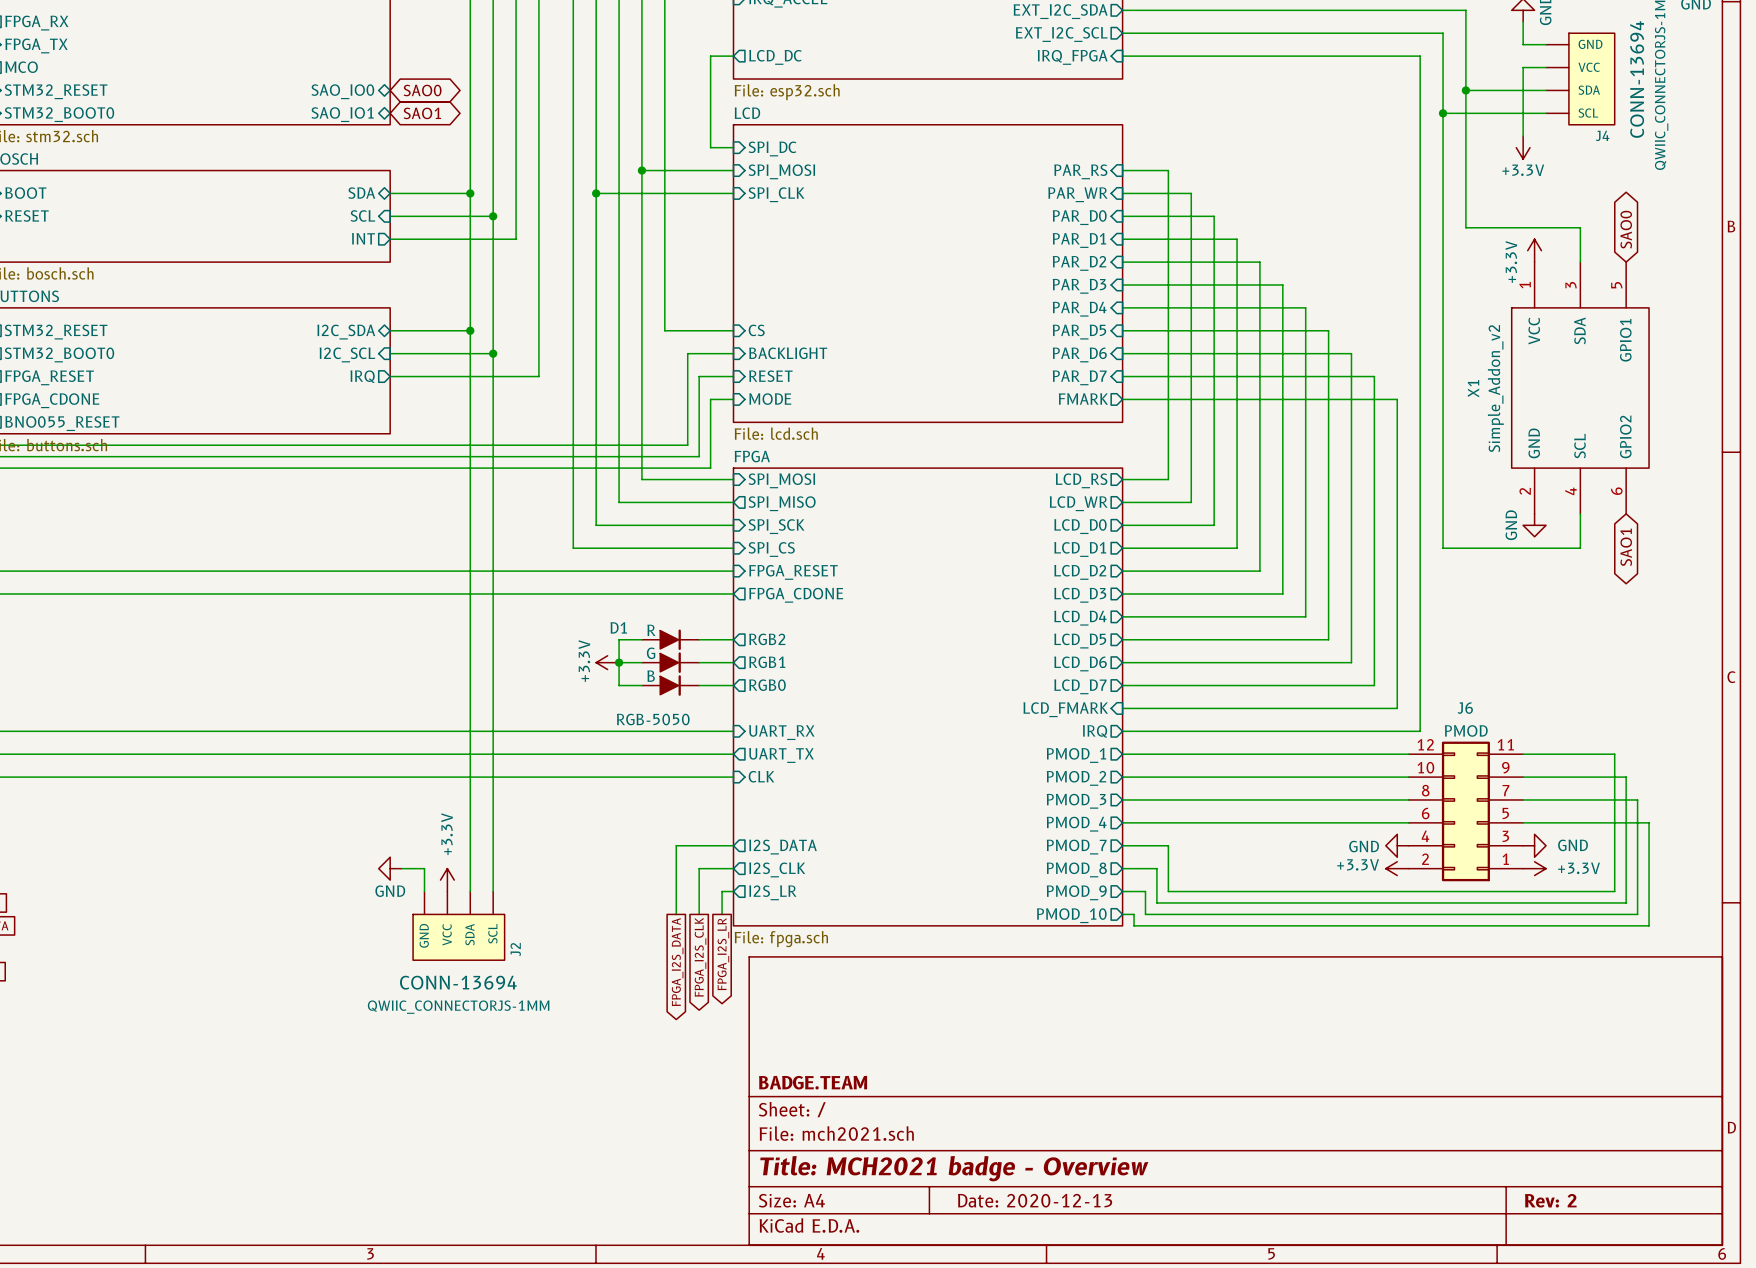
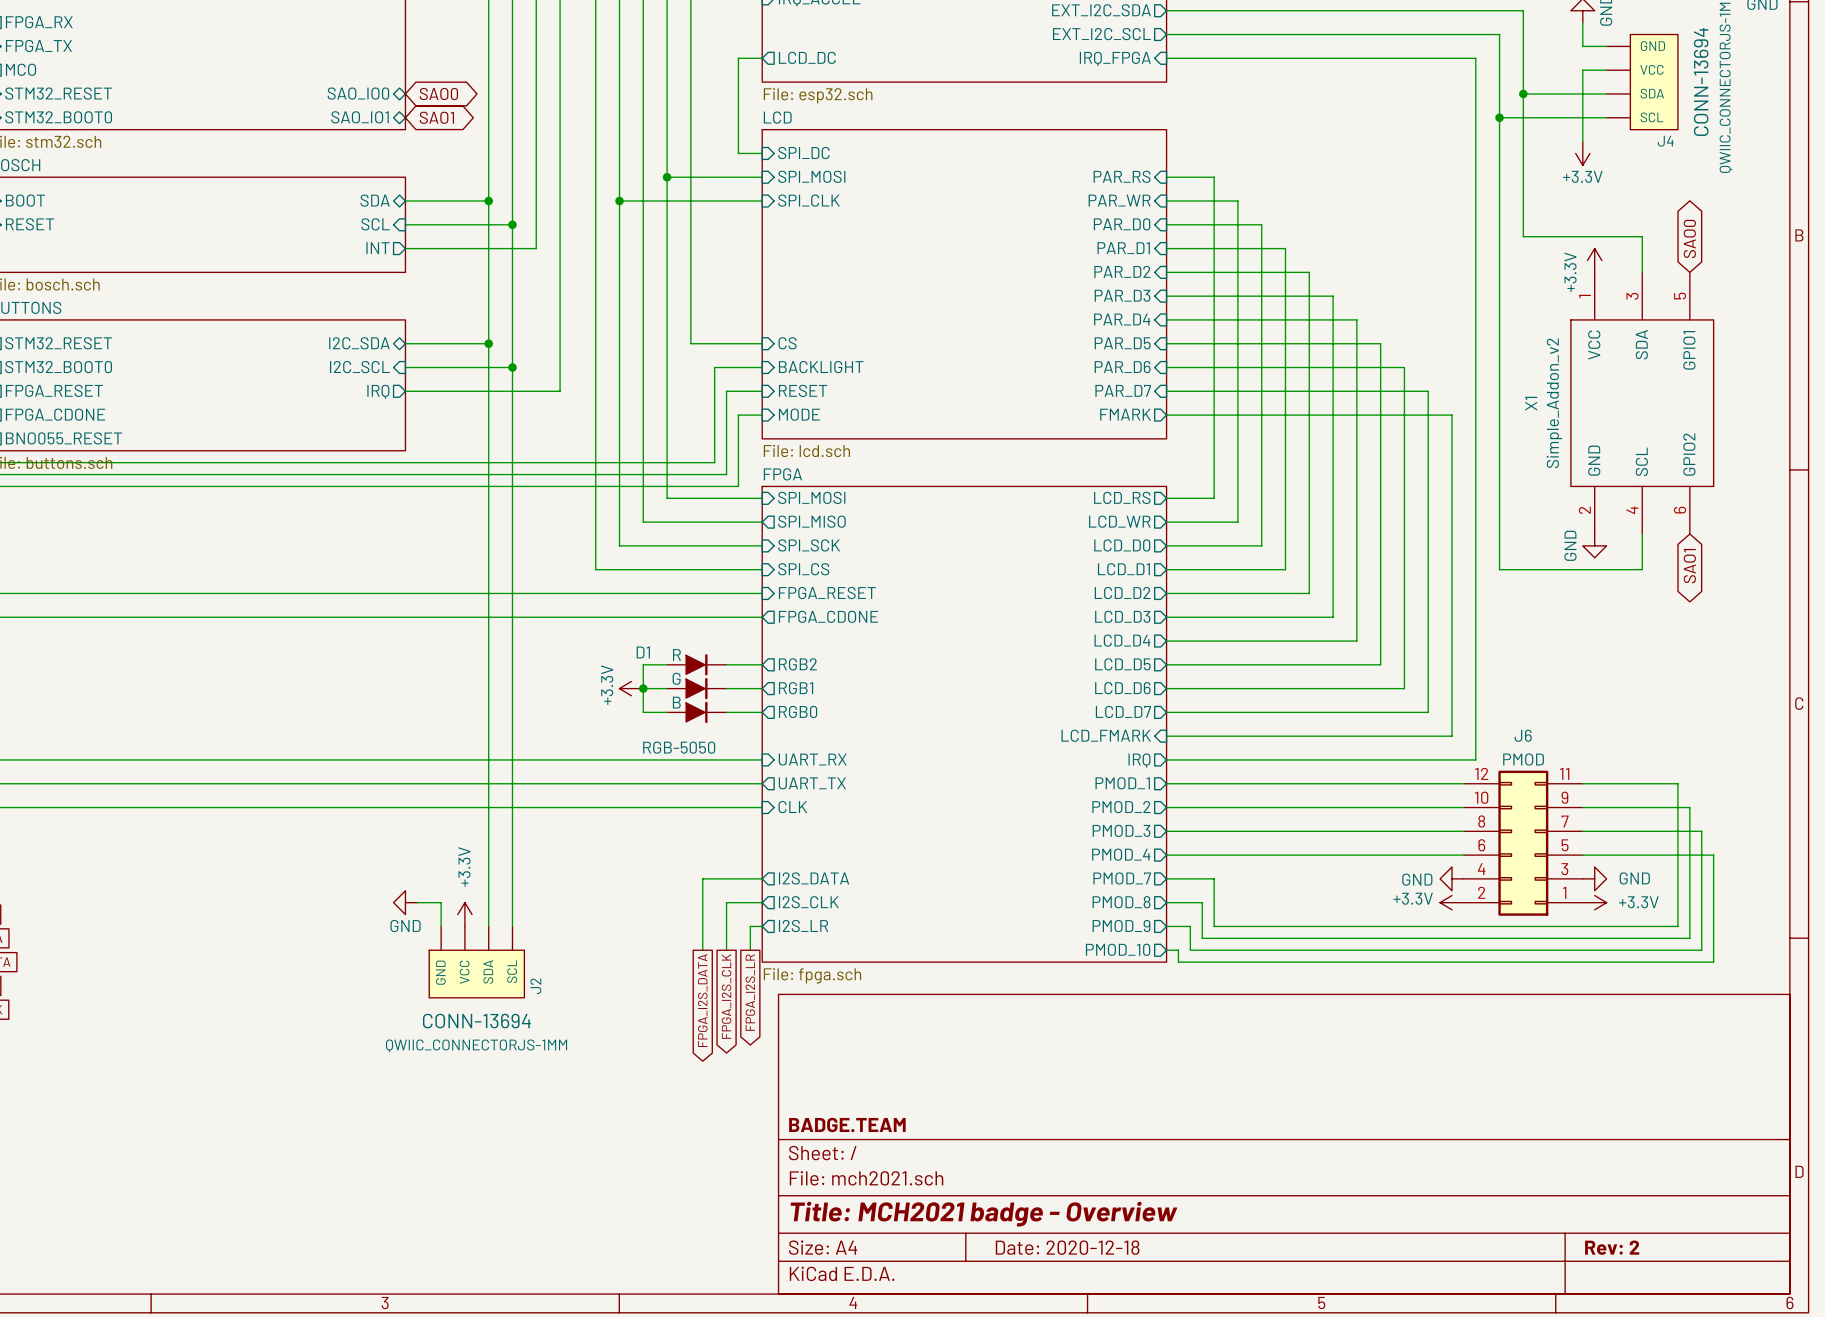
title block: Date: 2020-12-13 (1035, 1200) -> Date: 2020-12-18 (1067, 1247)

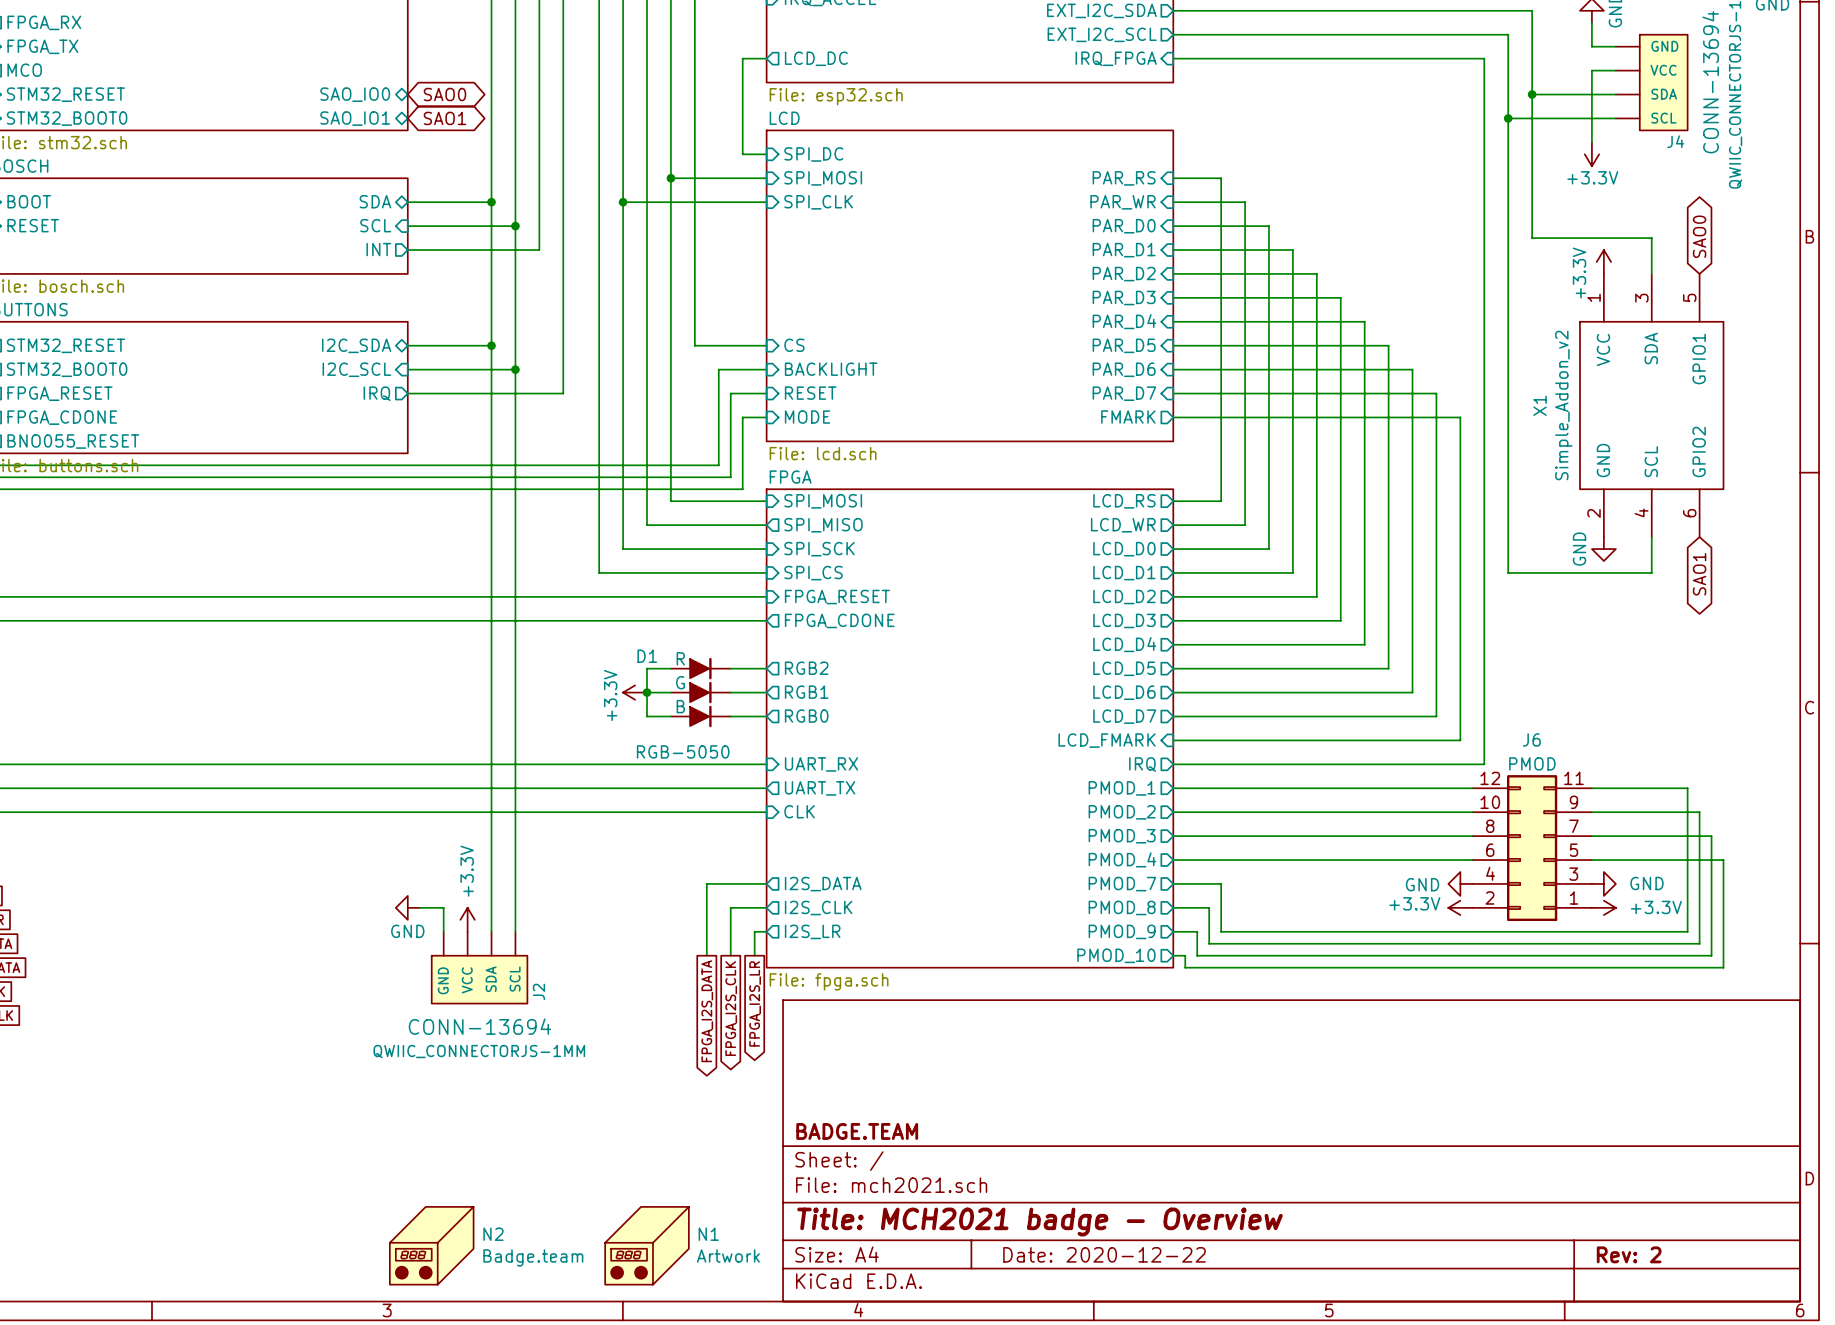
N2: none -> Badge.team (431, 1245)
N1: none -> Artwork (647, 1245)
title block: Date: 2020-12-18 (1067, 1247) -> Date: 2020-12-22 (1104, 1254)

